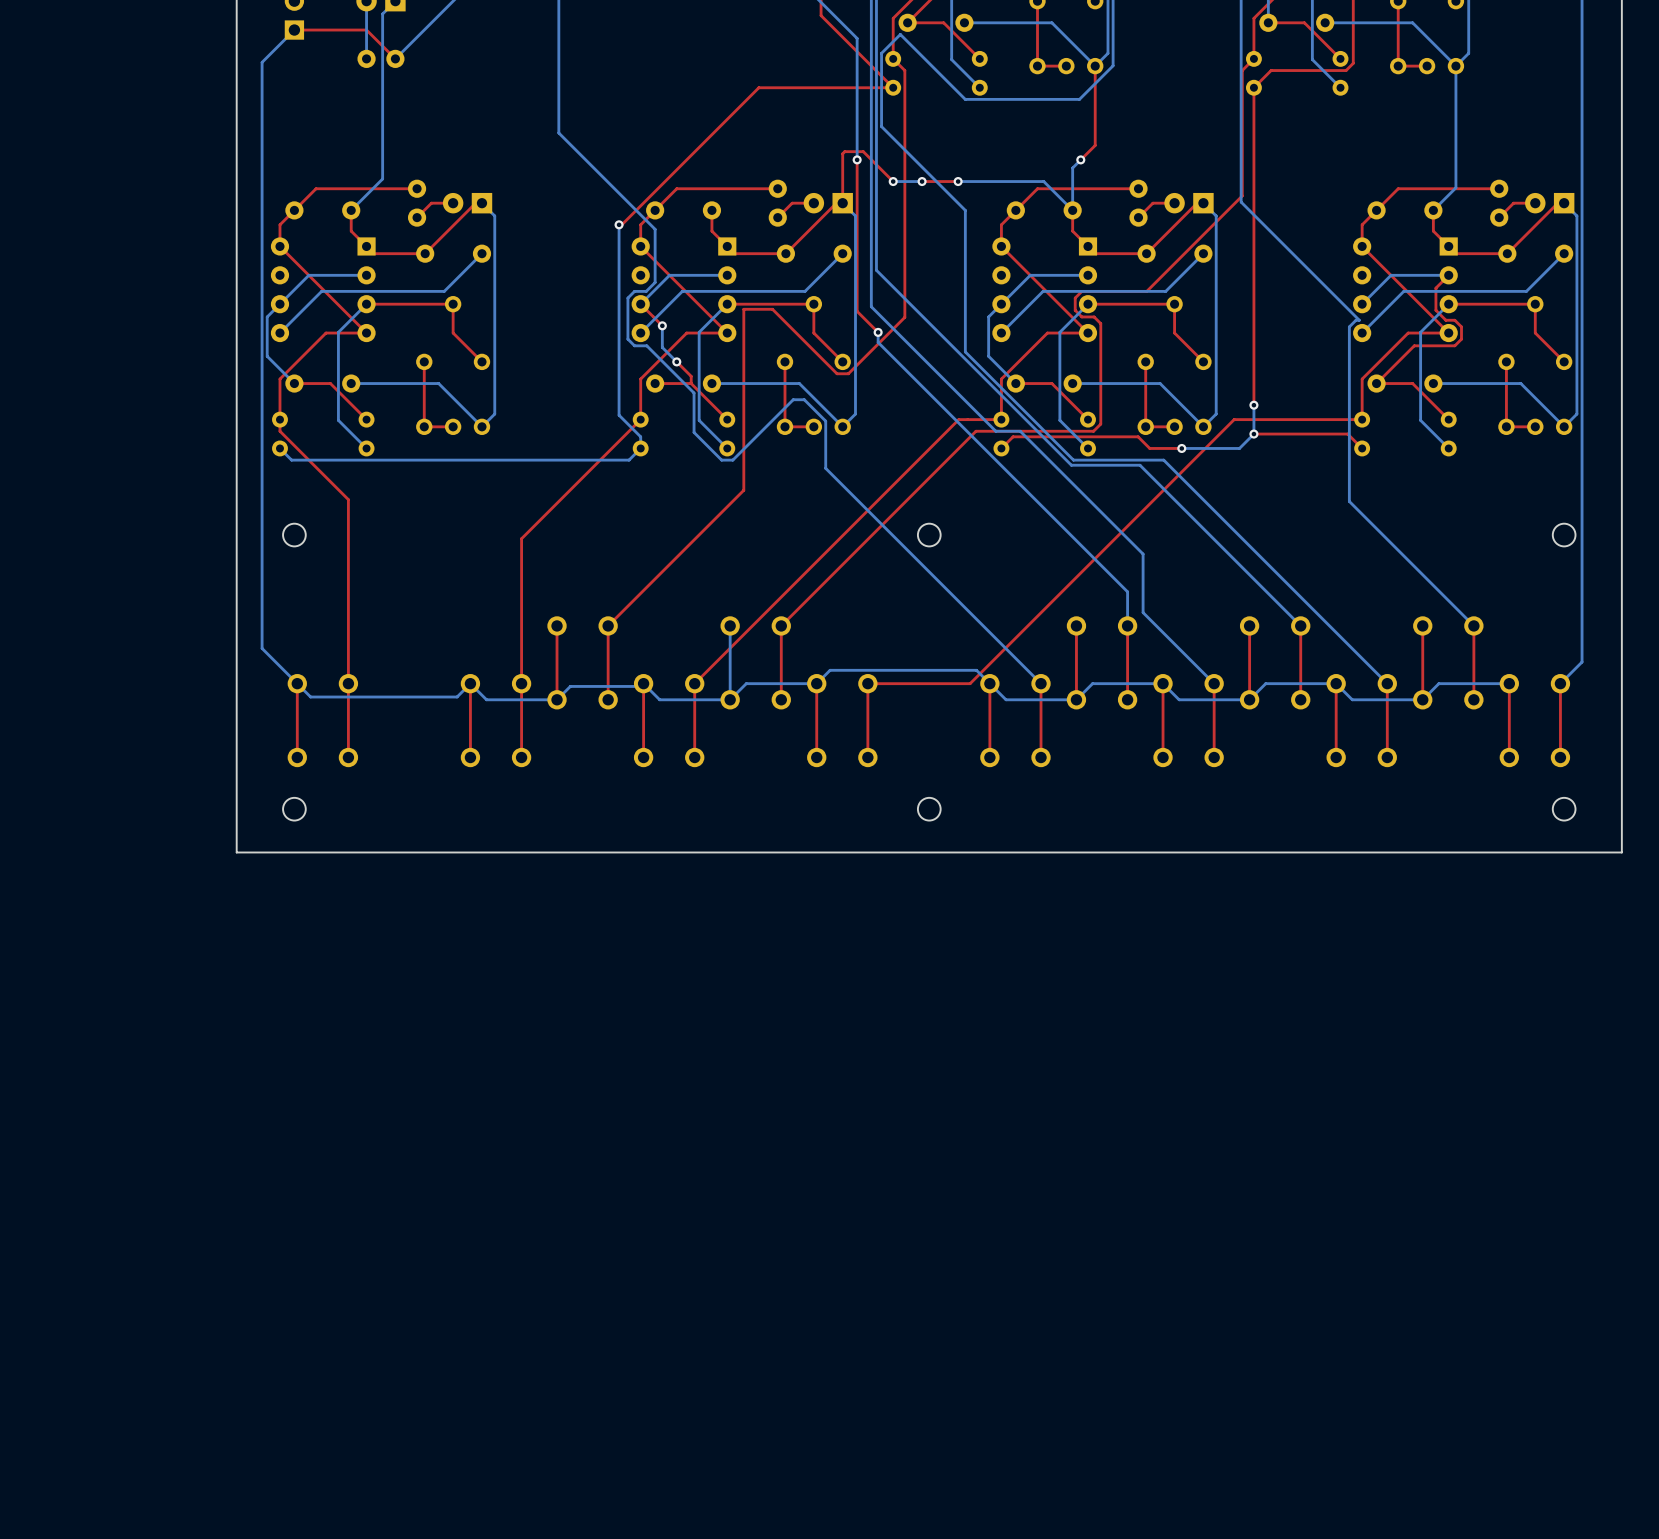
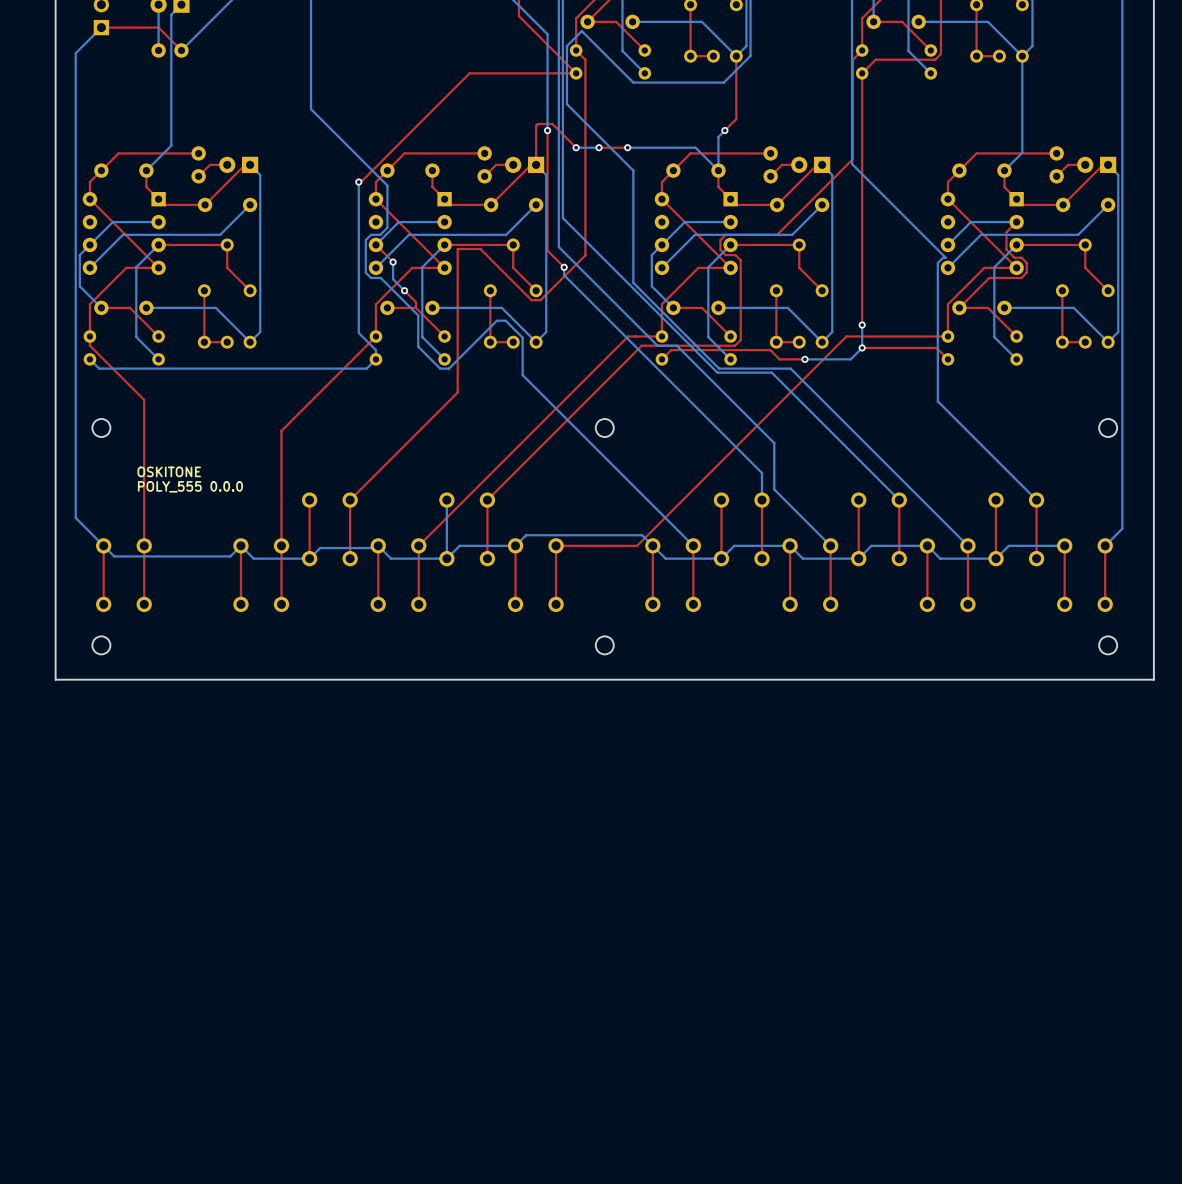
text: none -> OSKITONE (169, 471)
text: none -> POLY_555 0.0.0 (190, 486)

